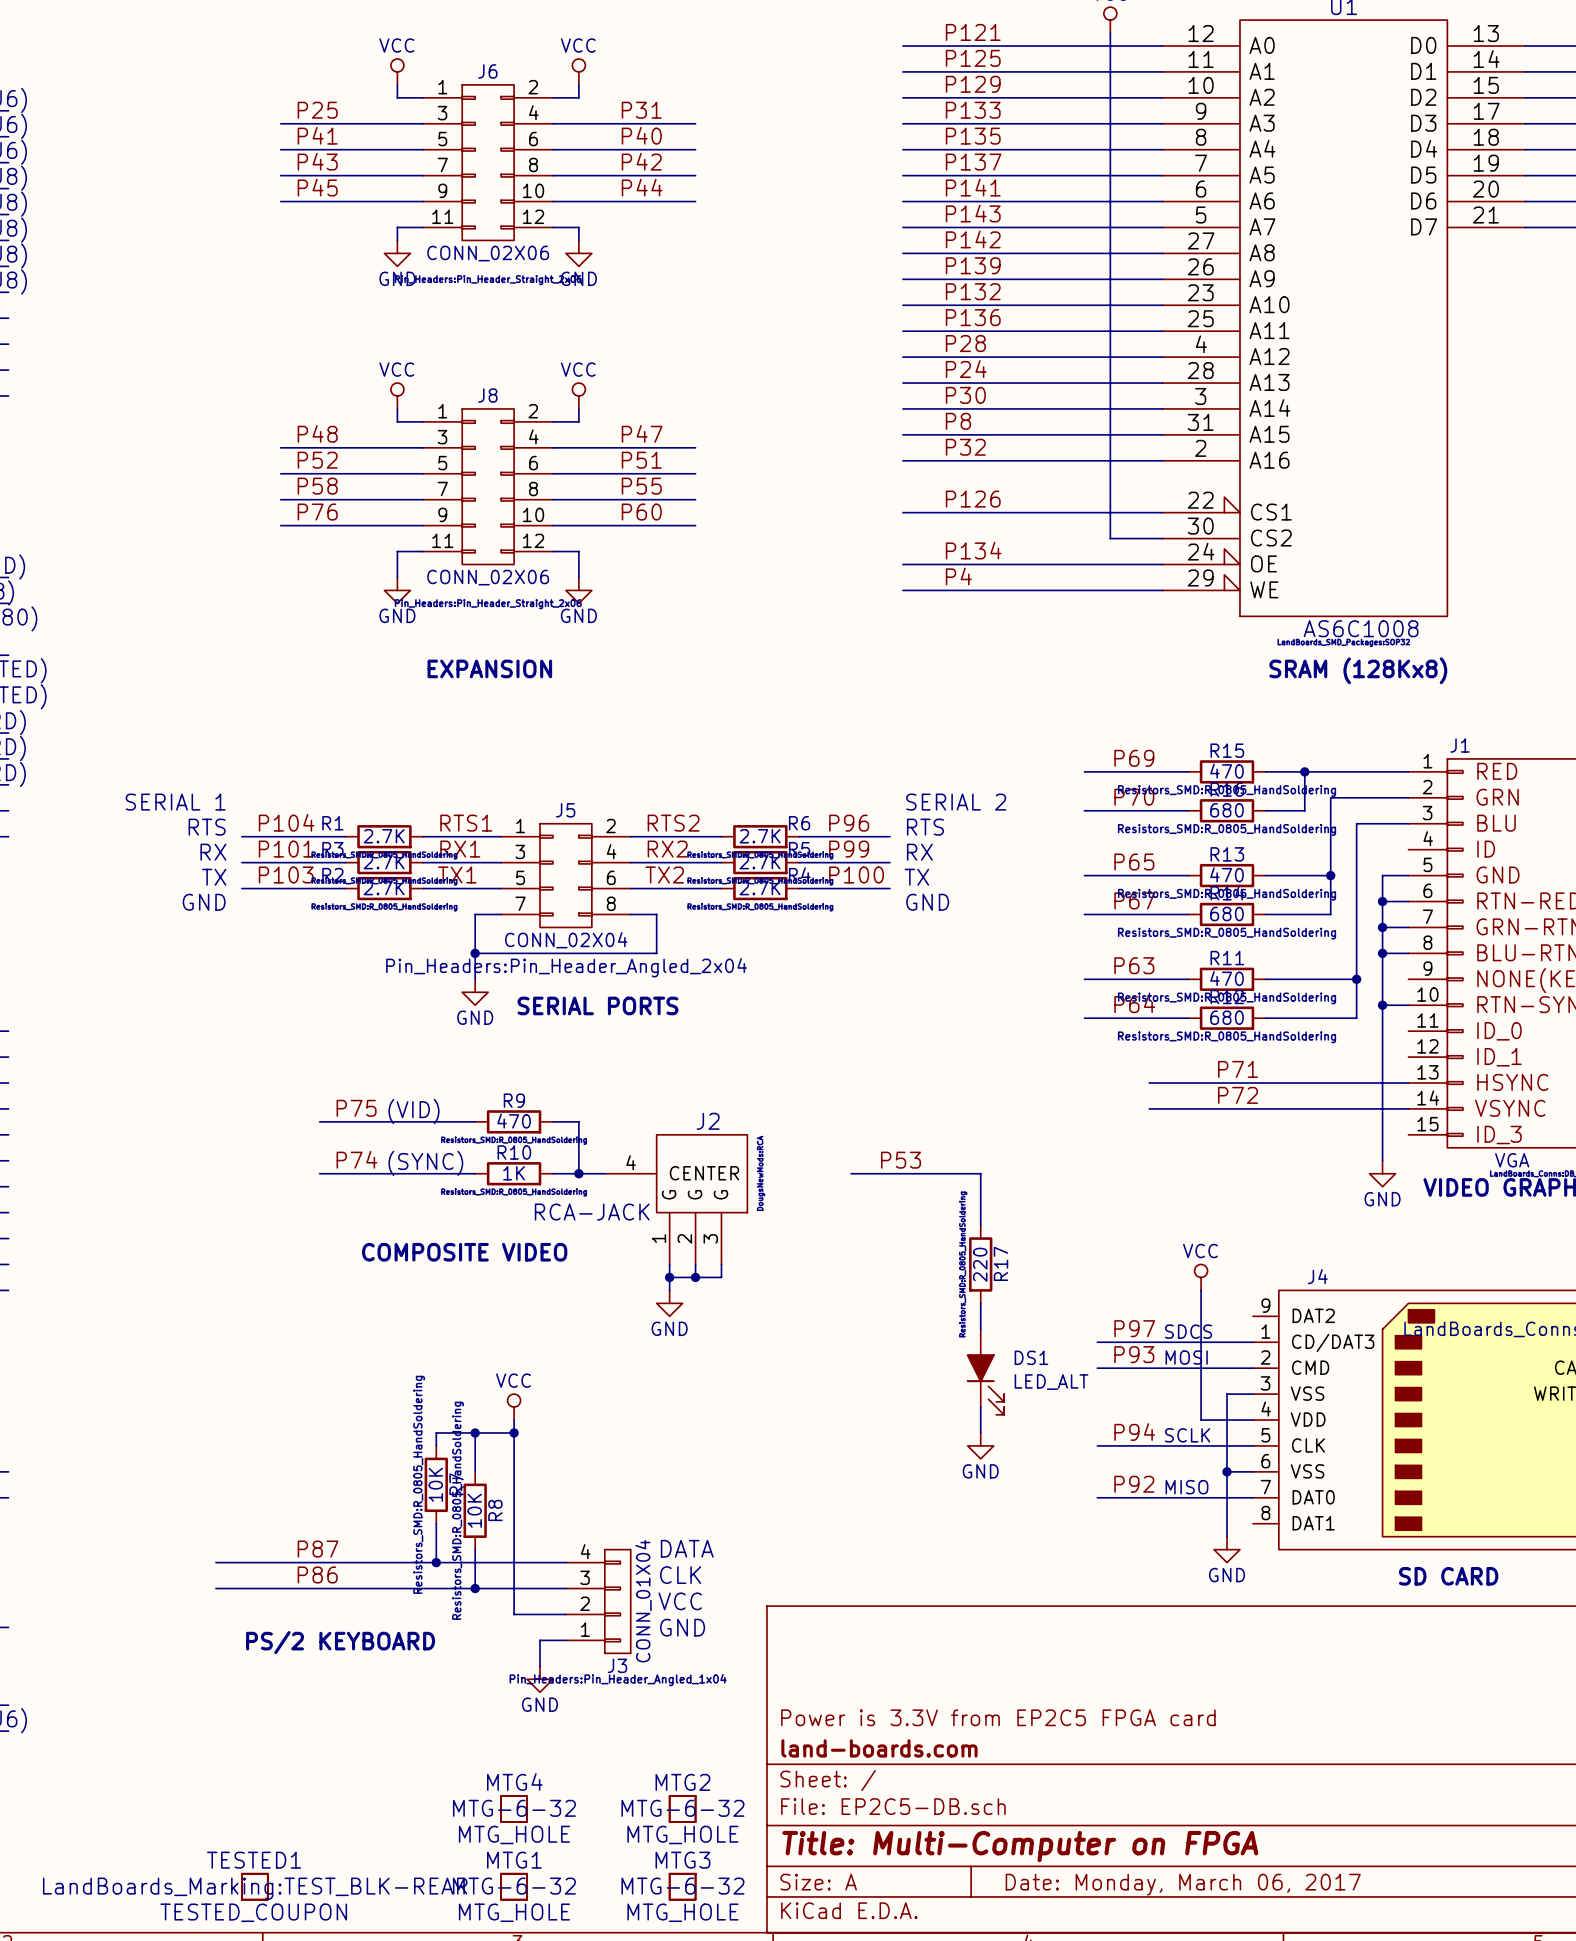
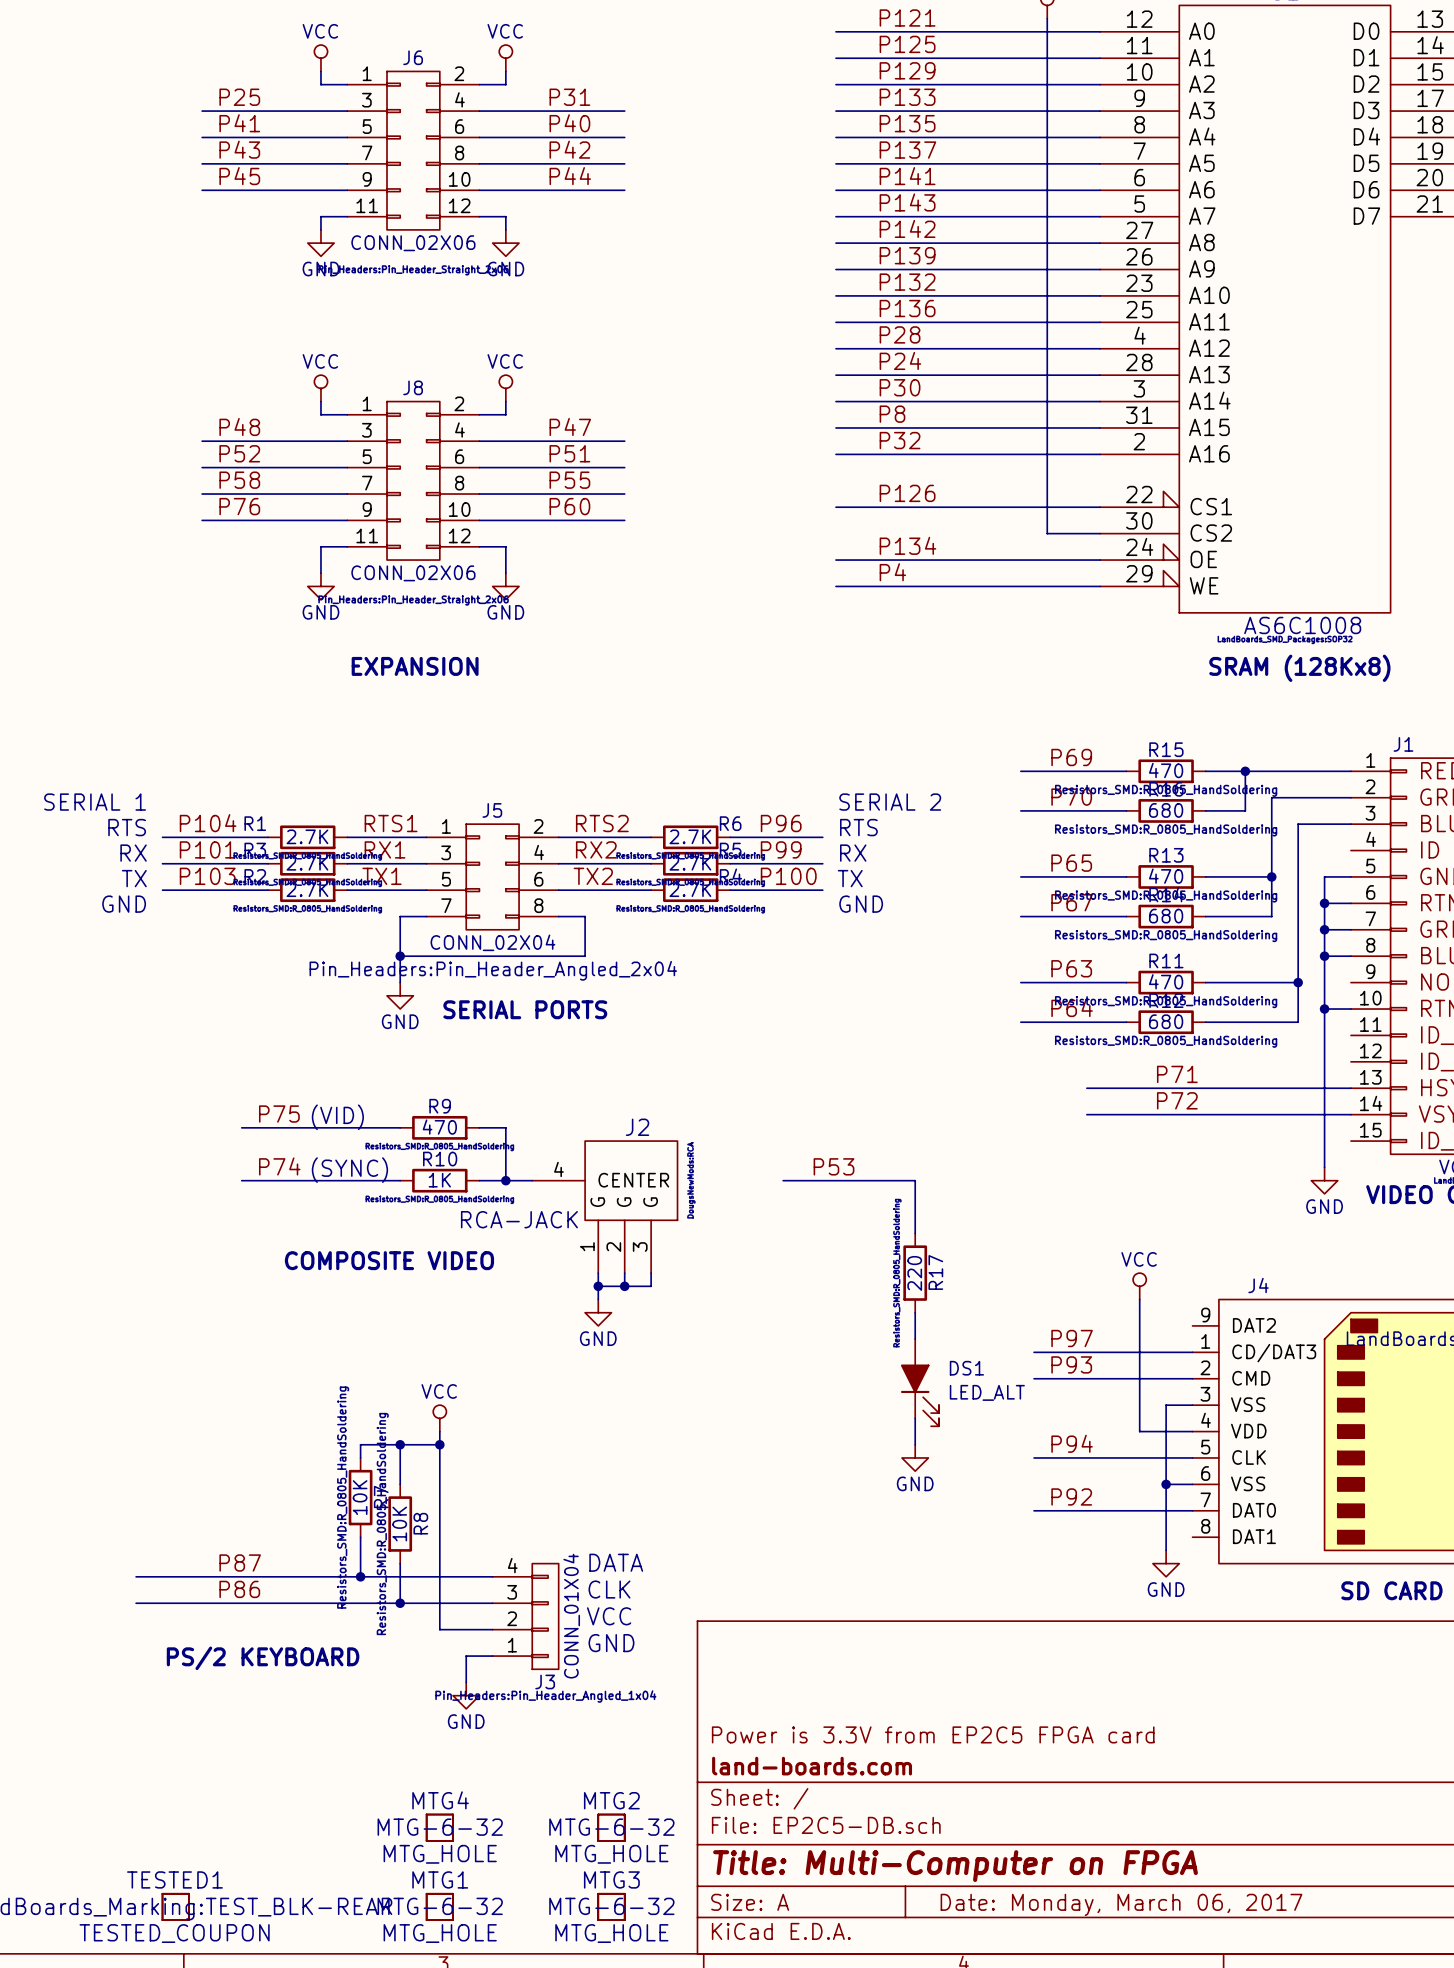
text: SDCS (1188, 1331) -> none
text: MOSI (1186, 1357) -> none
text: SCLK (1187, 1435) -> none
text: MISO (1186, 1487) -> none

